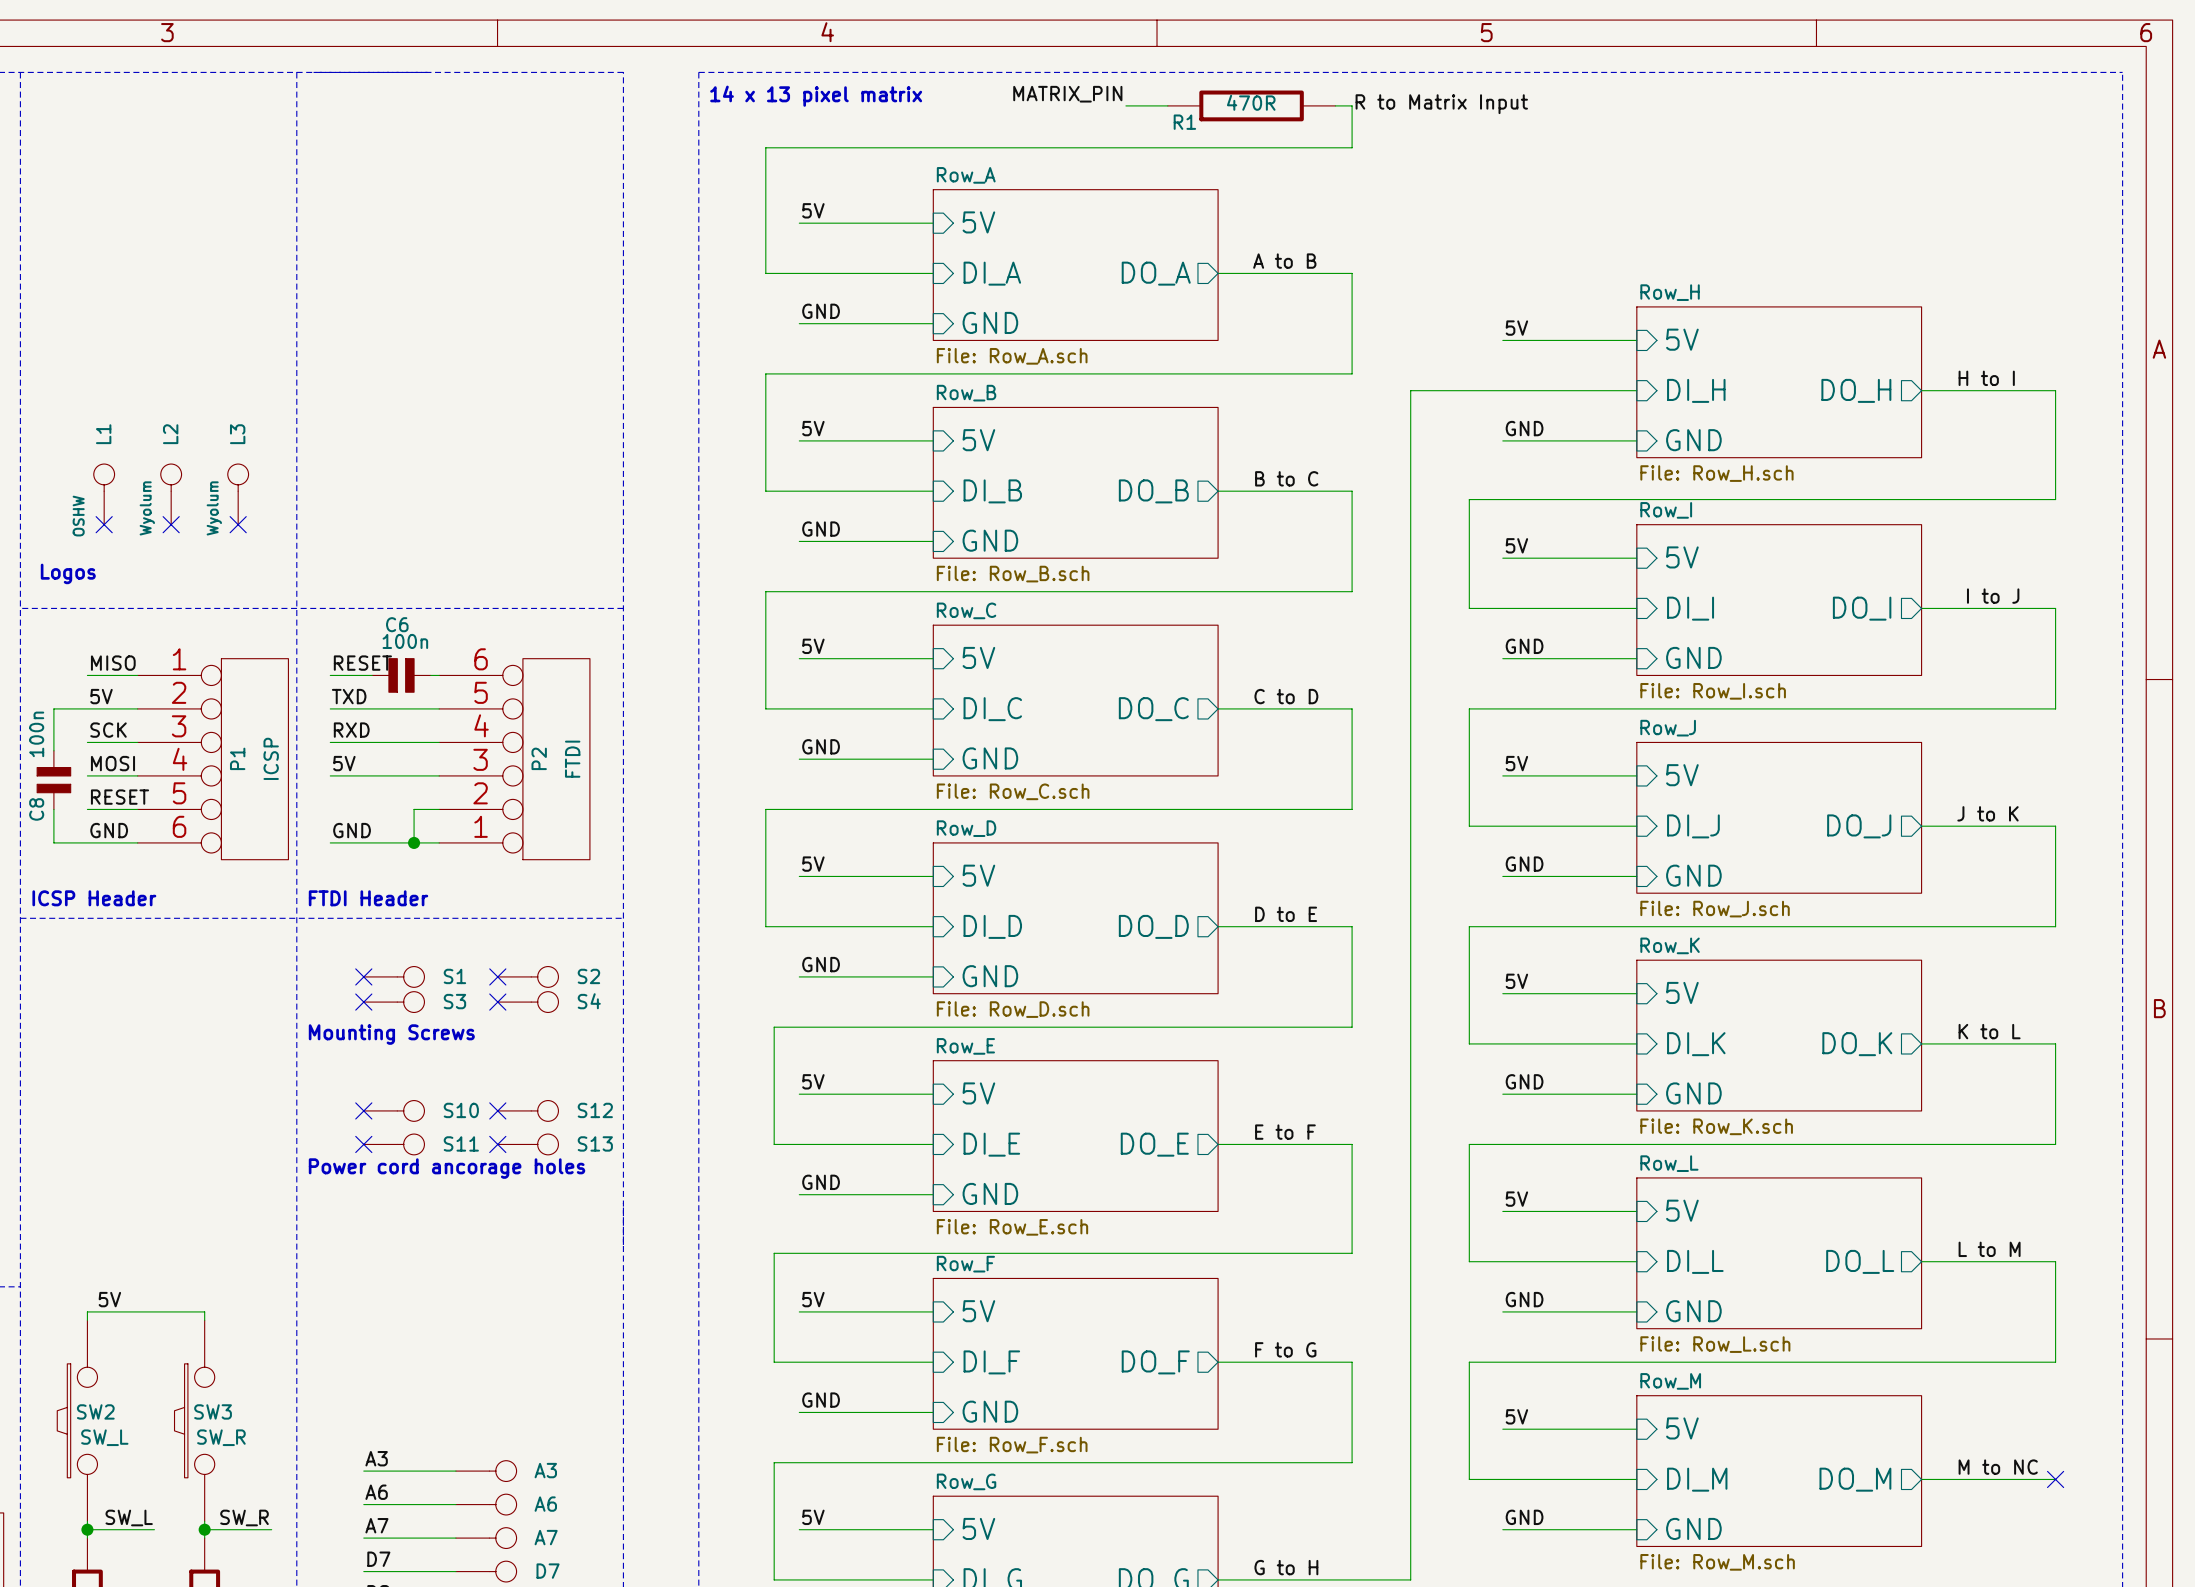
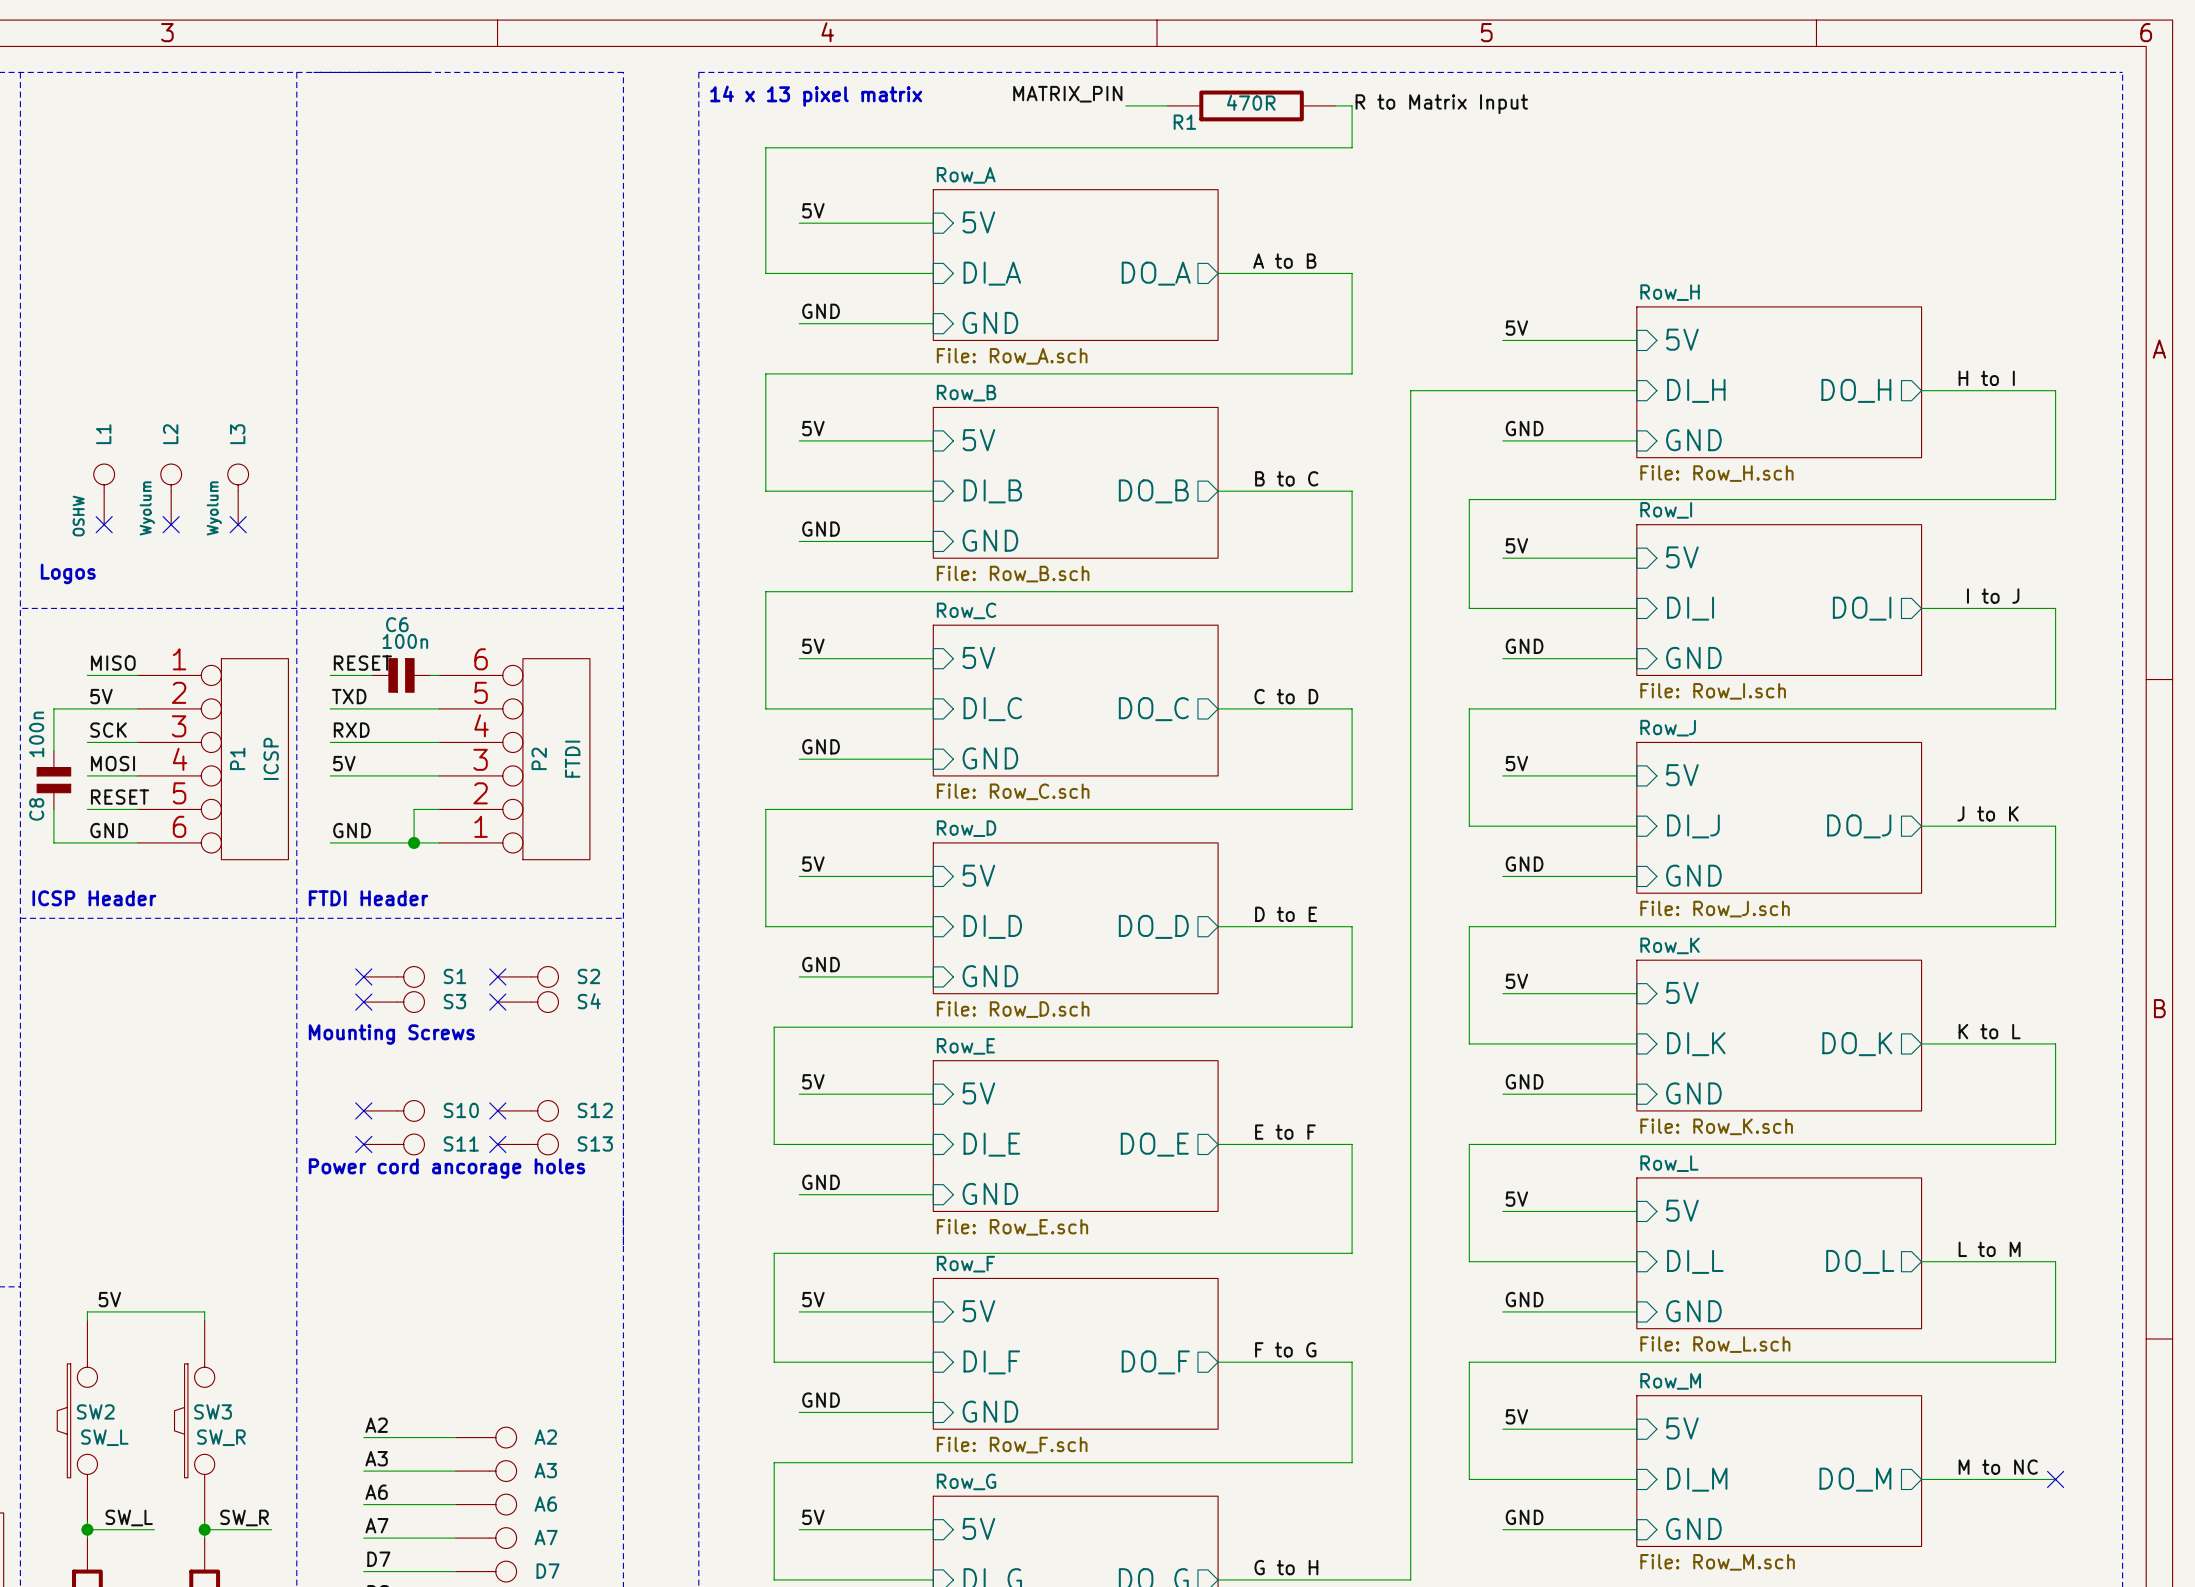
label: none -> A2 (376, 1425)
wire: none -> (363, 1437) (455, 1437)
A2: none -> (486, 1437)

